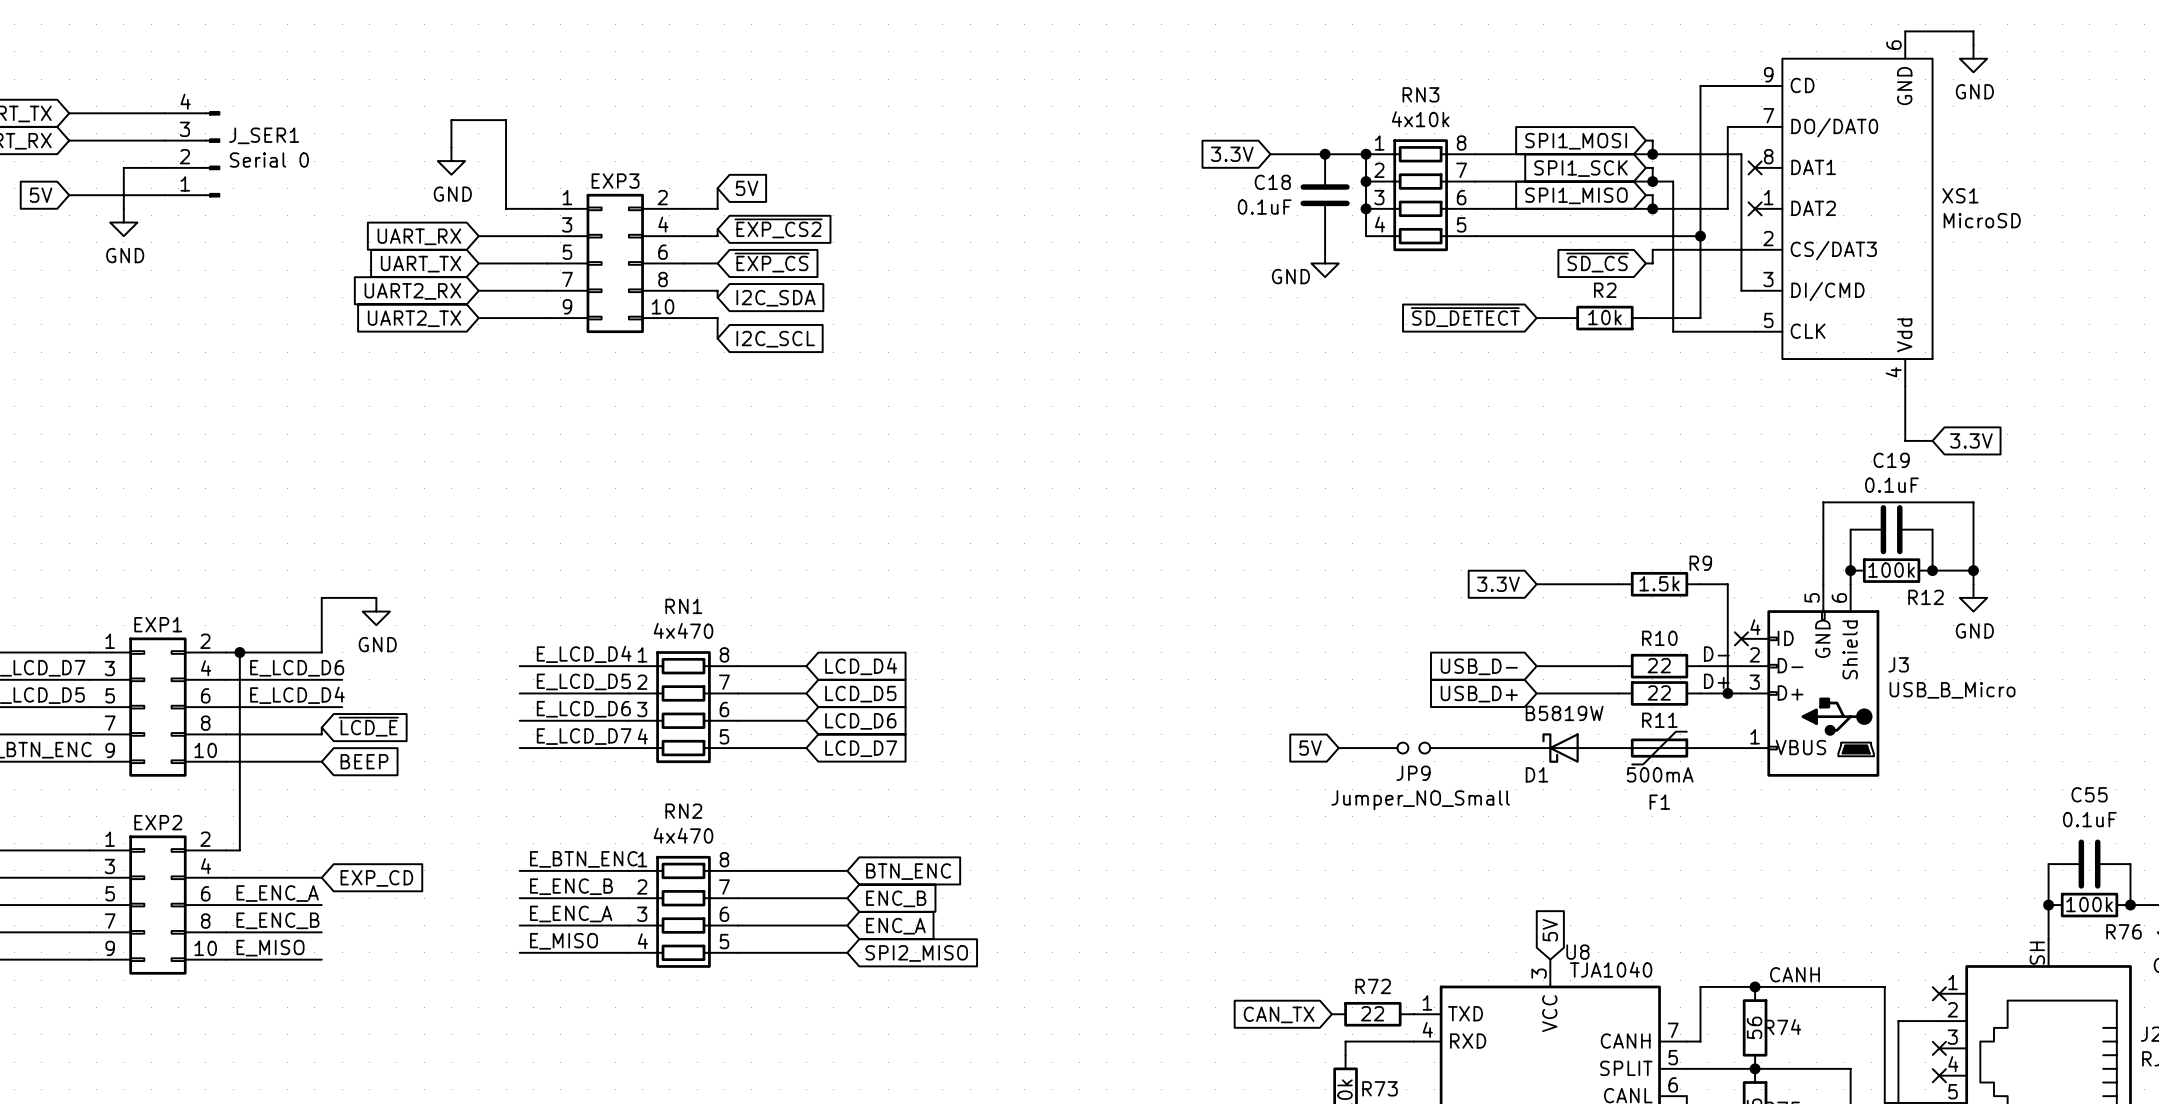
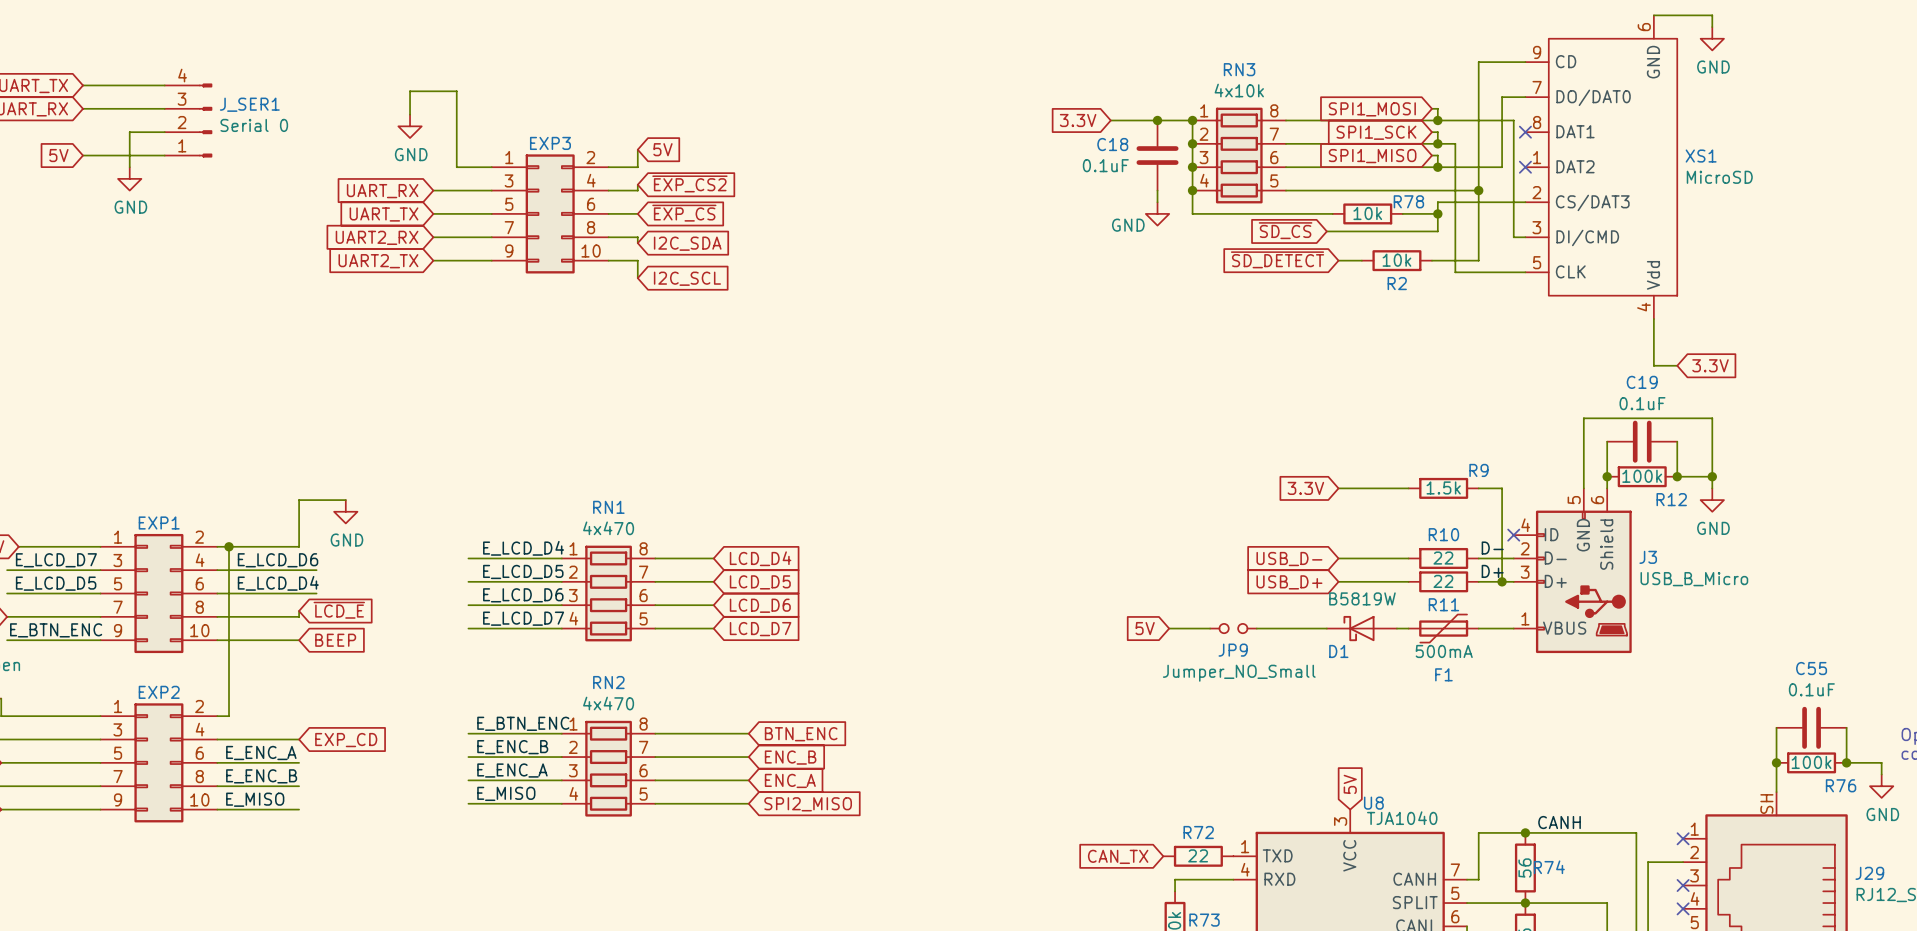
wire: none -> (1192, 190) (1192, 213) (1332, 213)
junction: none -> (1192, 190)
global label position: ~{SD_CS} (1597, 262) -> ~{SD_CS} (1285, 230)
R78: none -> 10k (1367, 213)
wire: none -> (1402, 213) (1431, 213)
wire: none -> (1437, 213) (1437, 231) (1326, 231)
junction: none -> (1437, 213)
R2 name position: R2 (1605, 290) -> R2 (1397, 283)

